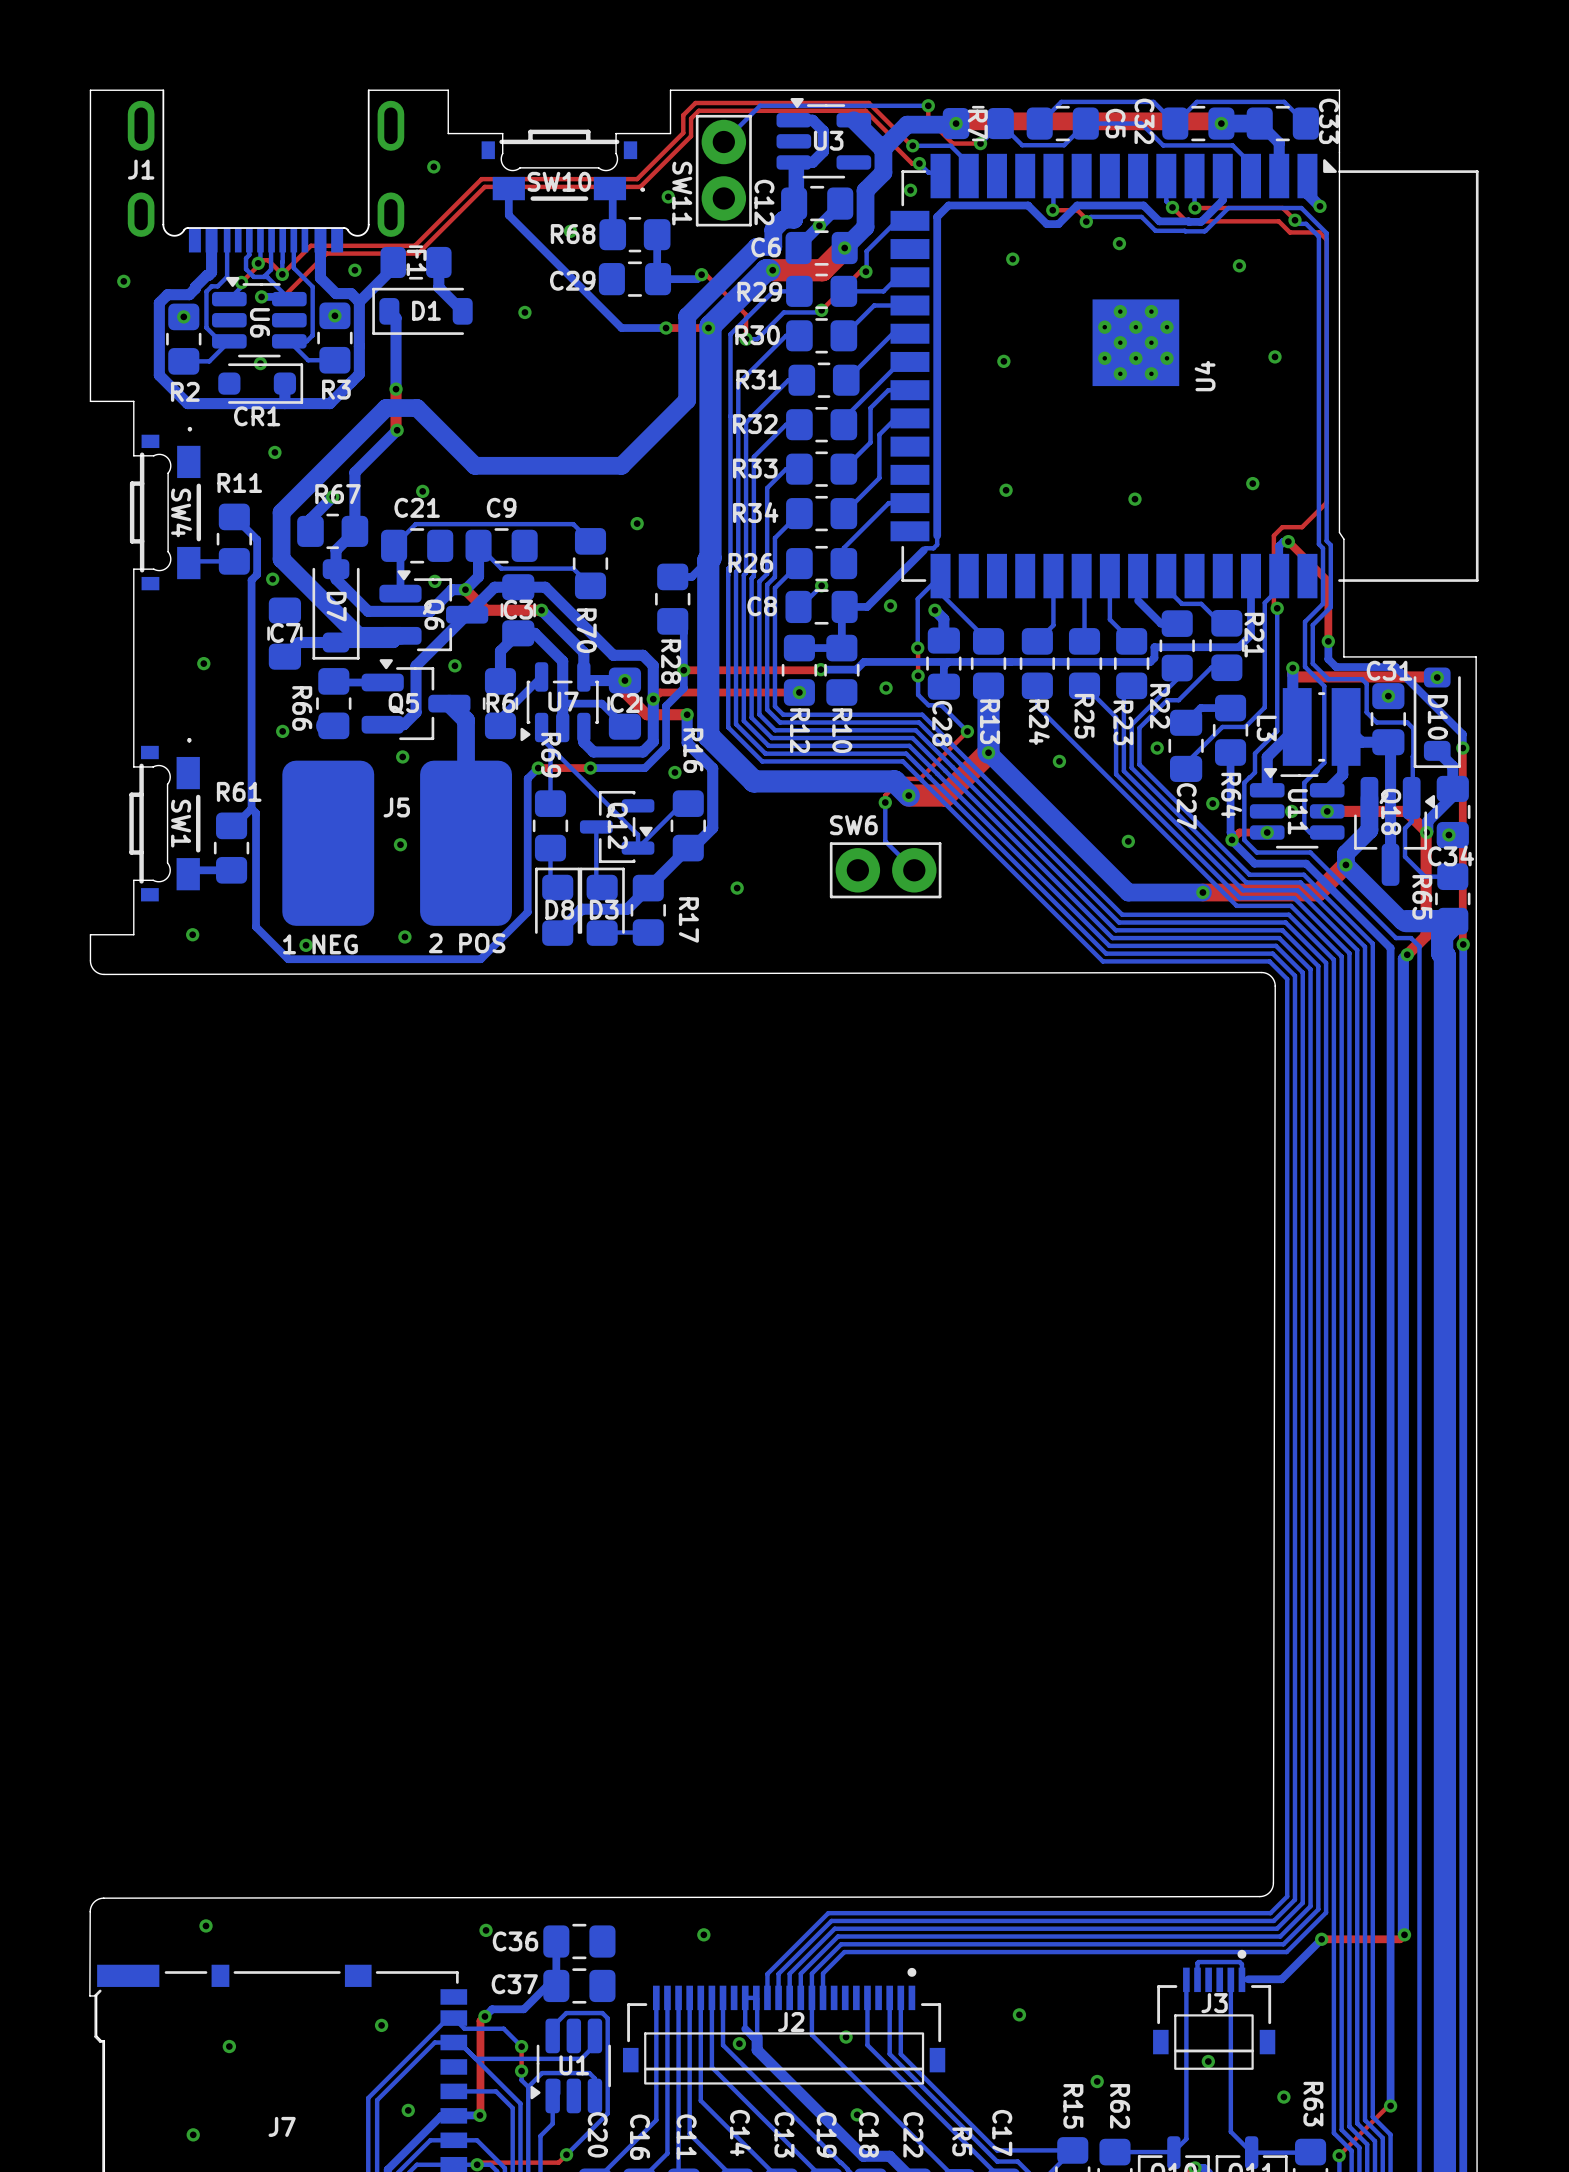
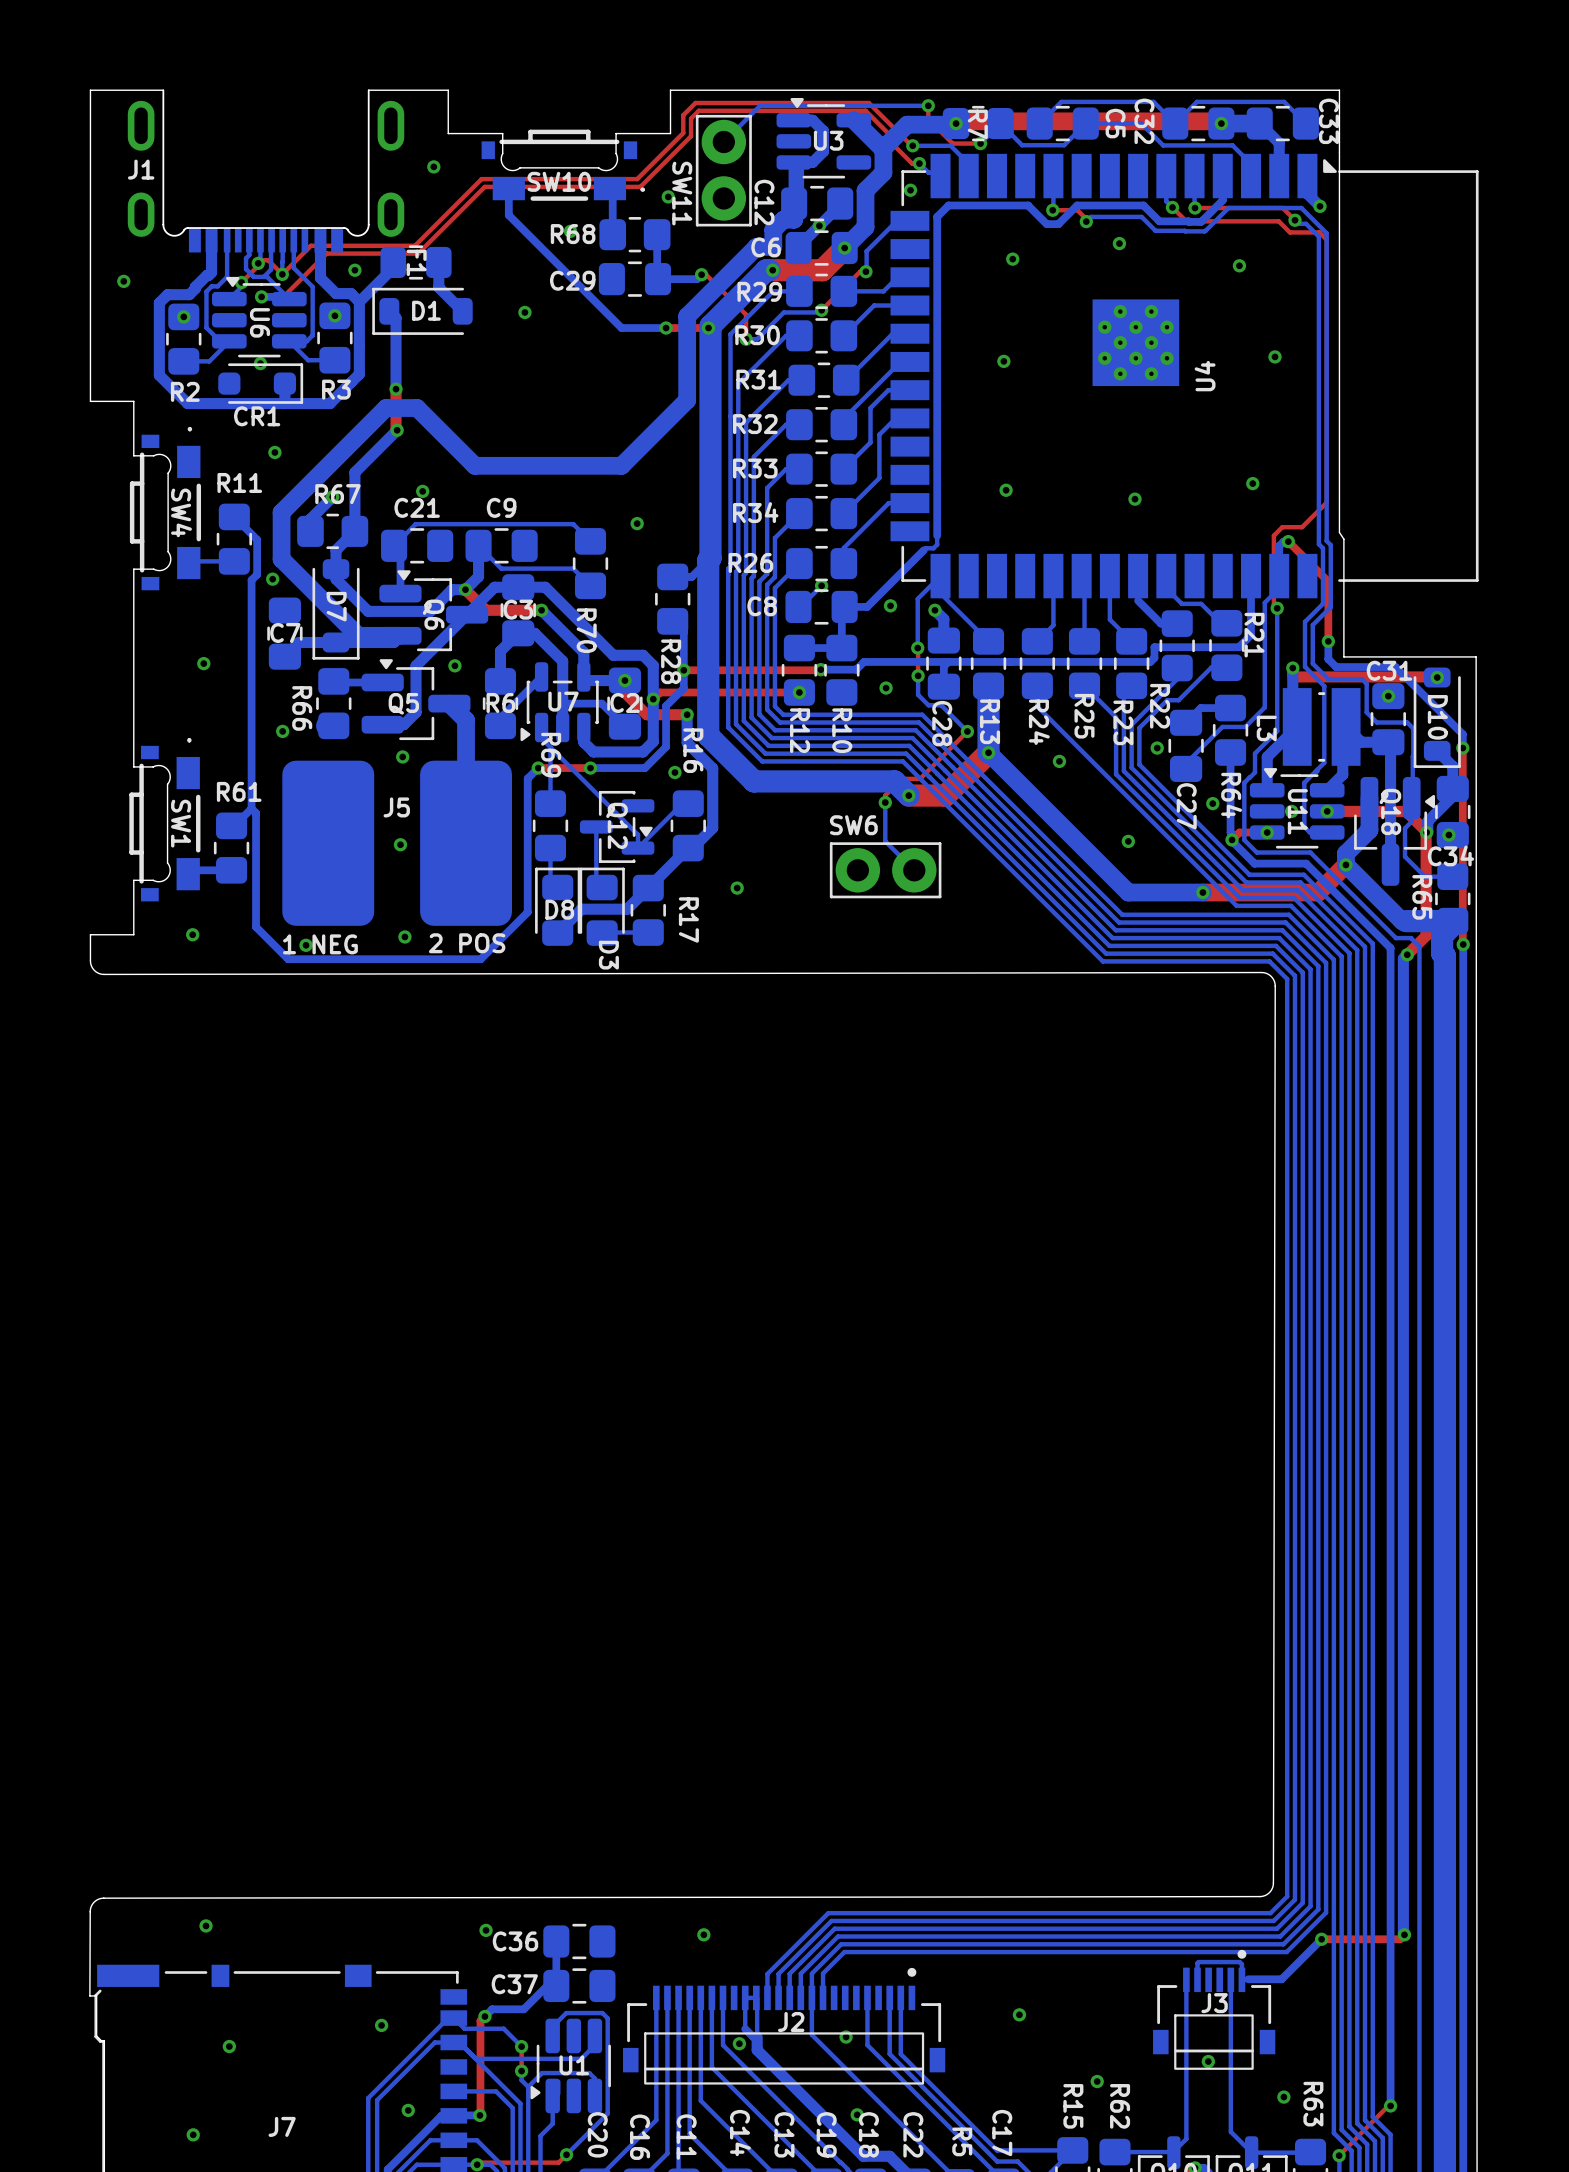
via: (434, 581) -> none
D3 name rotation: 0° (604, 909) -> 90° clockwise (608, 955)
D3 name position: D3 (604, 909) -> D3 (608, 955)

